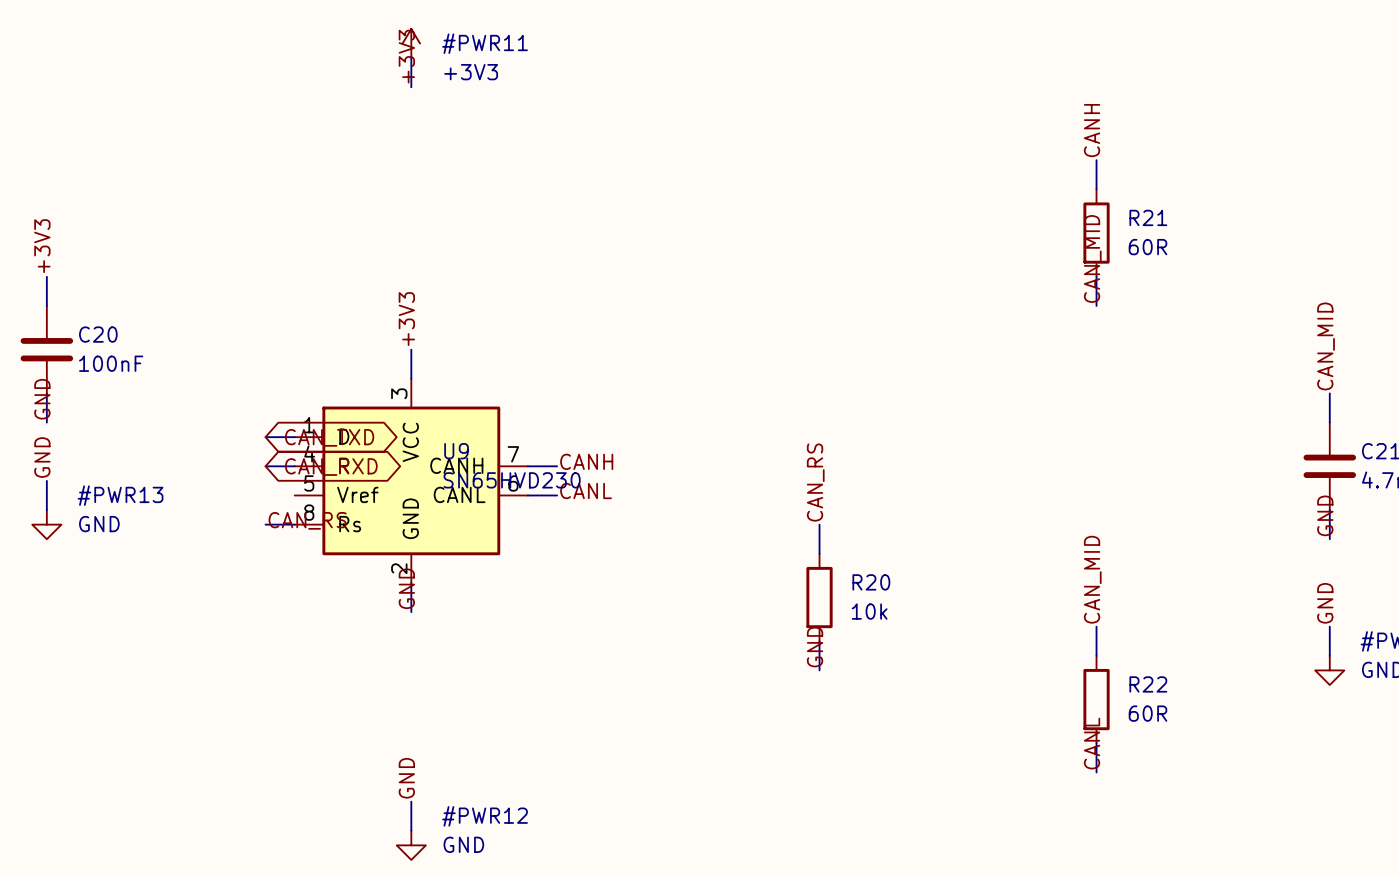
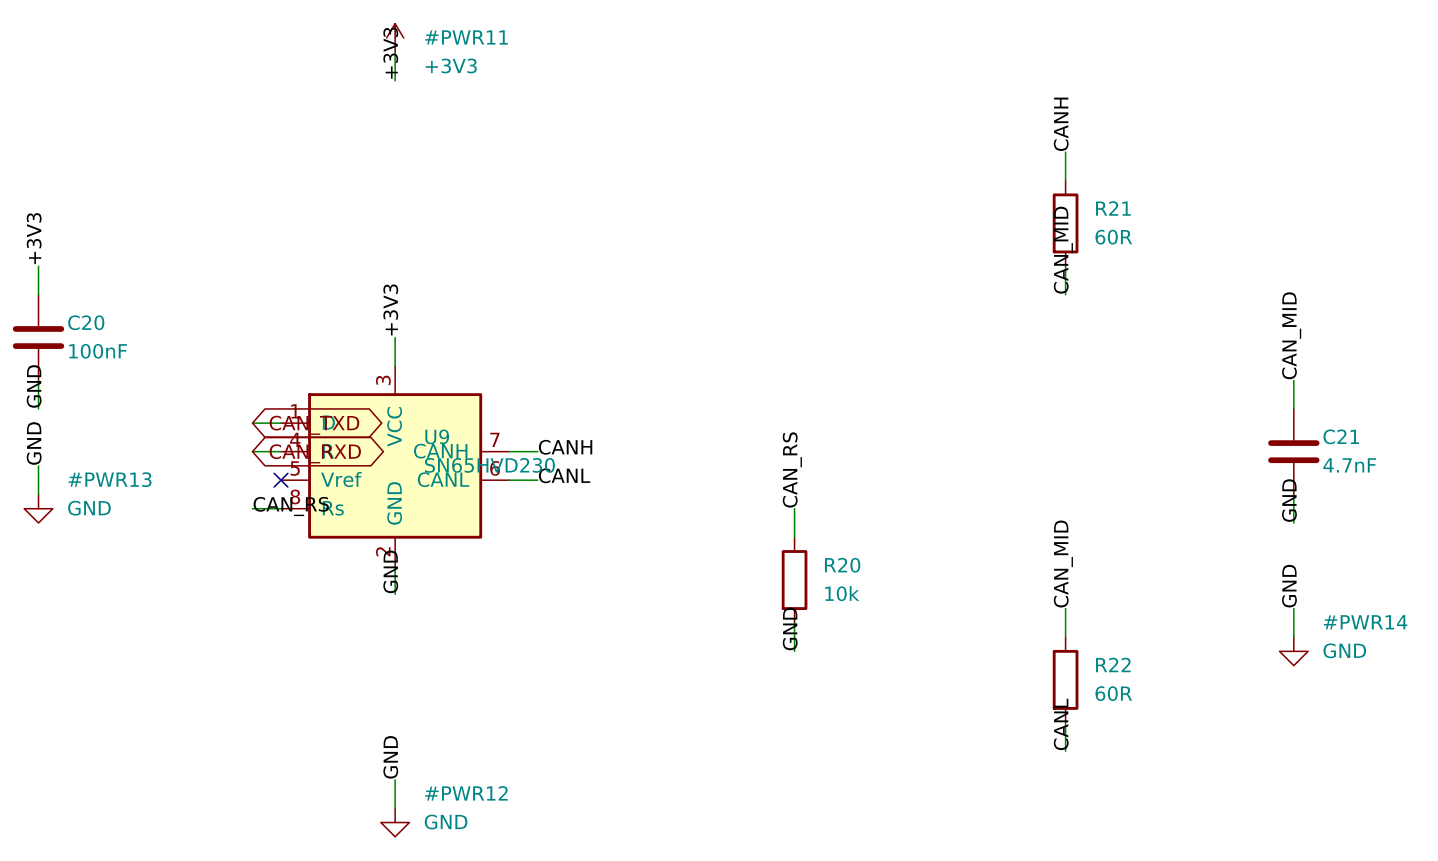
no-connect mark: none -> (281, 480)

